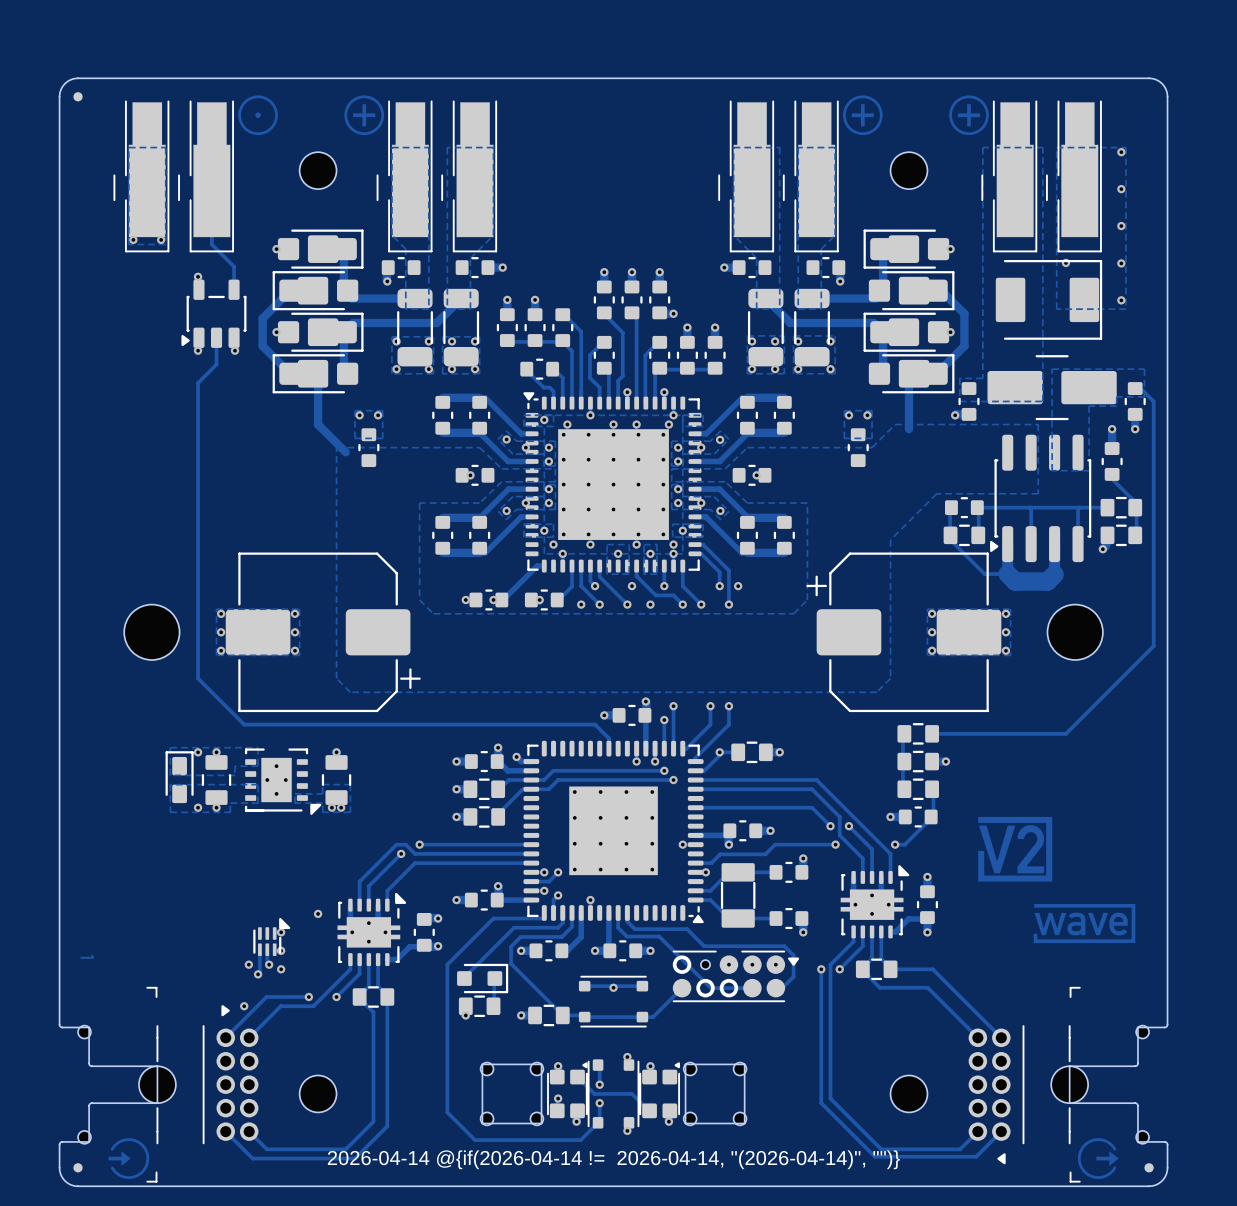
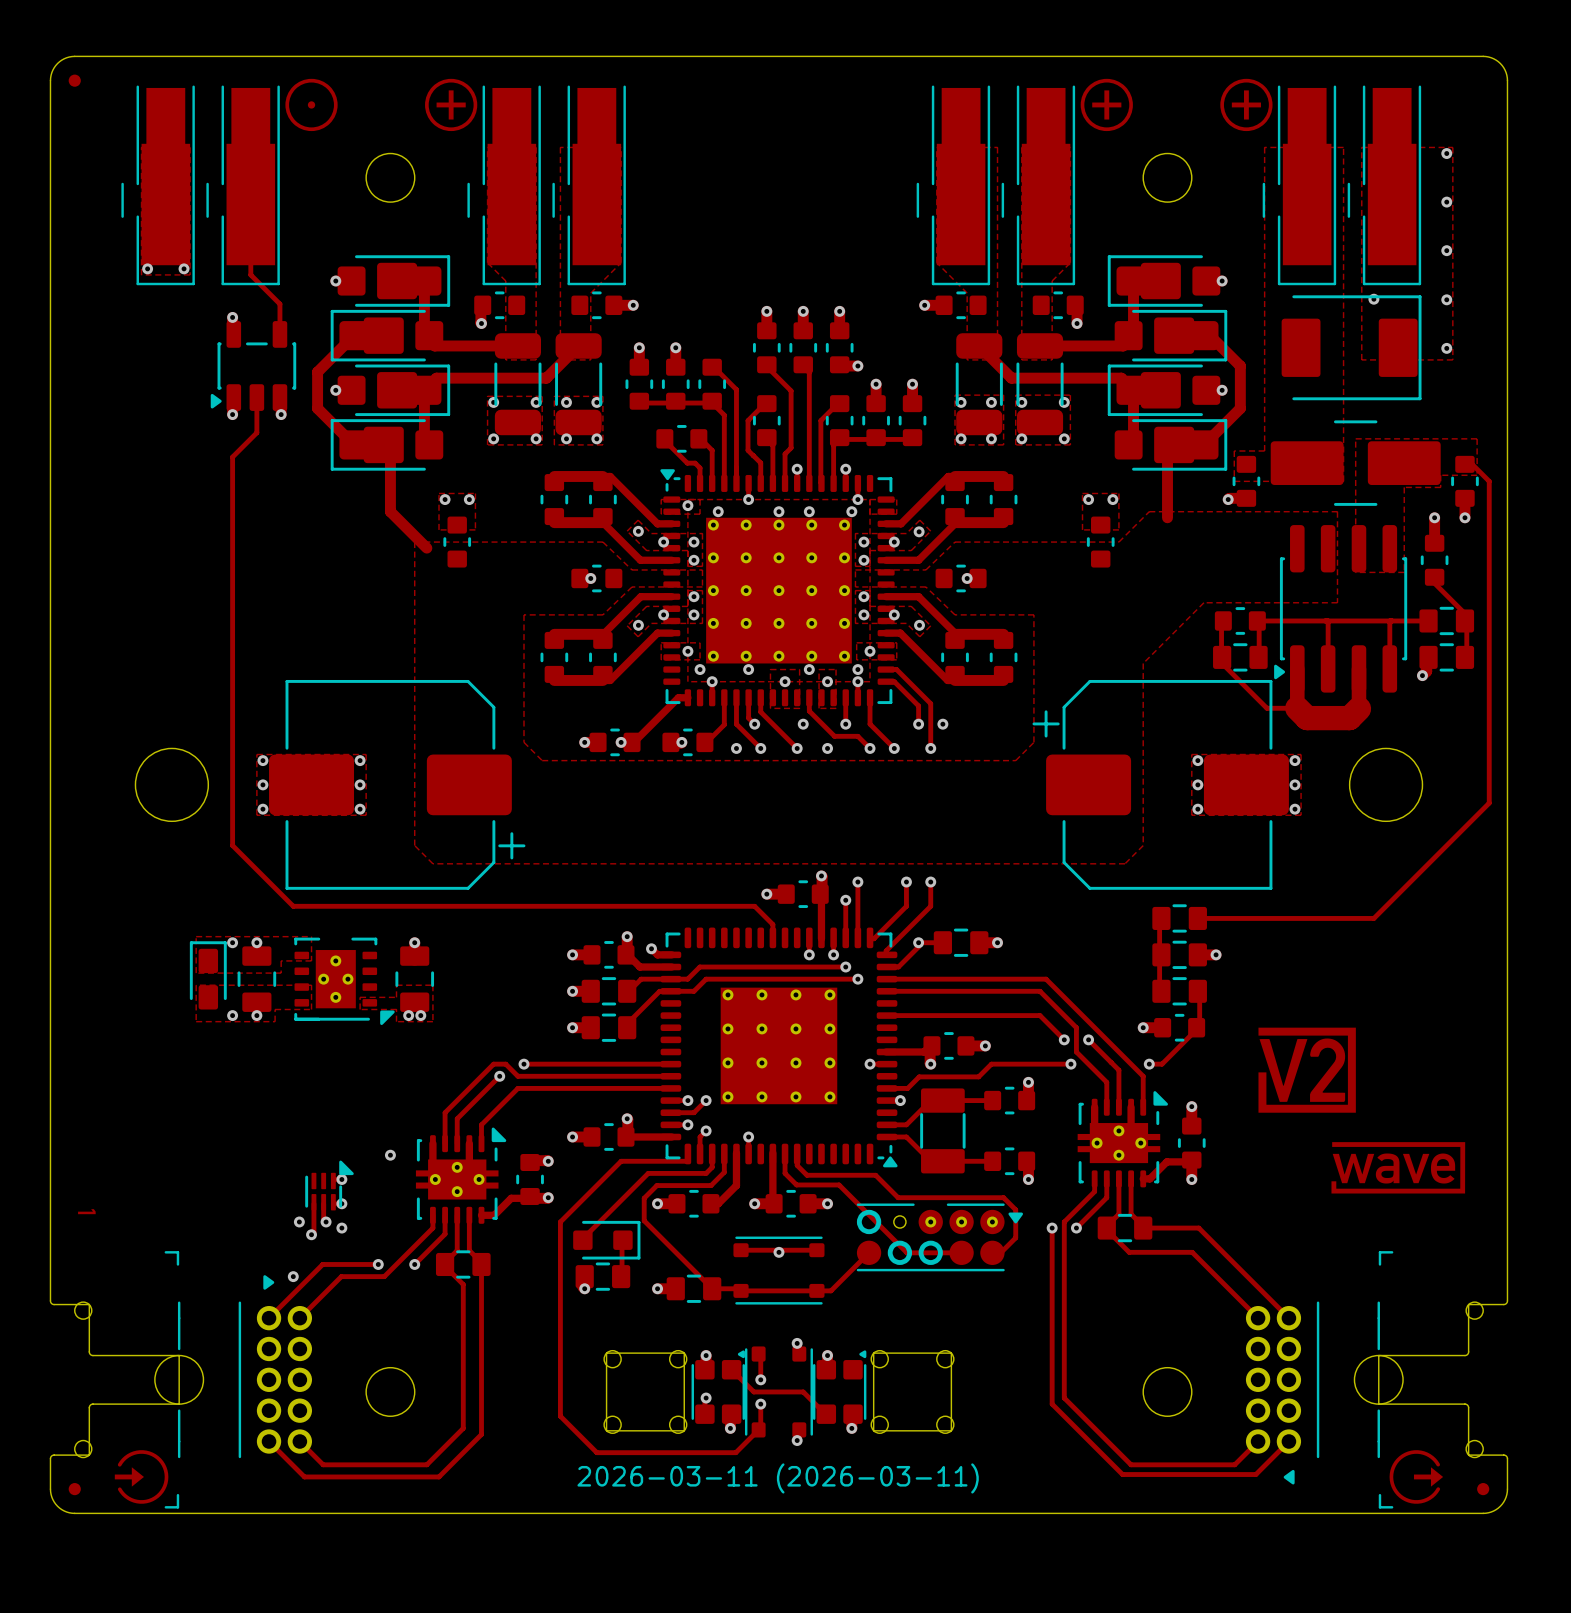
drawing shape: [327, 1150, 900, 1170] -> [577, 1463, 979, 1494]

